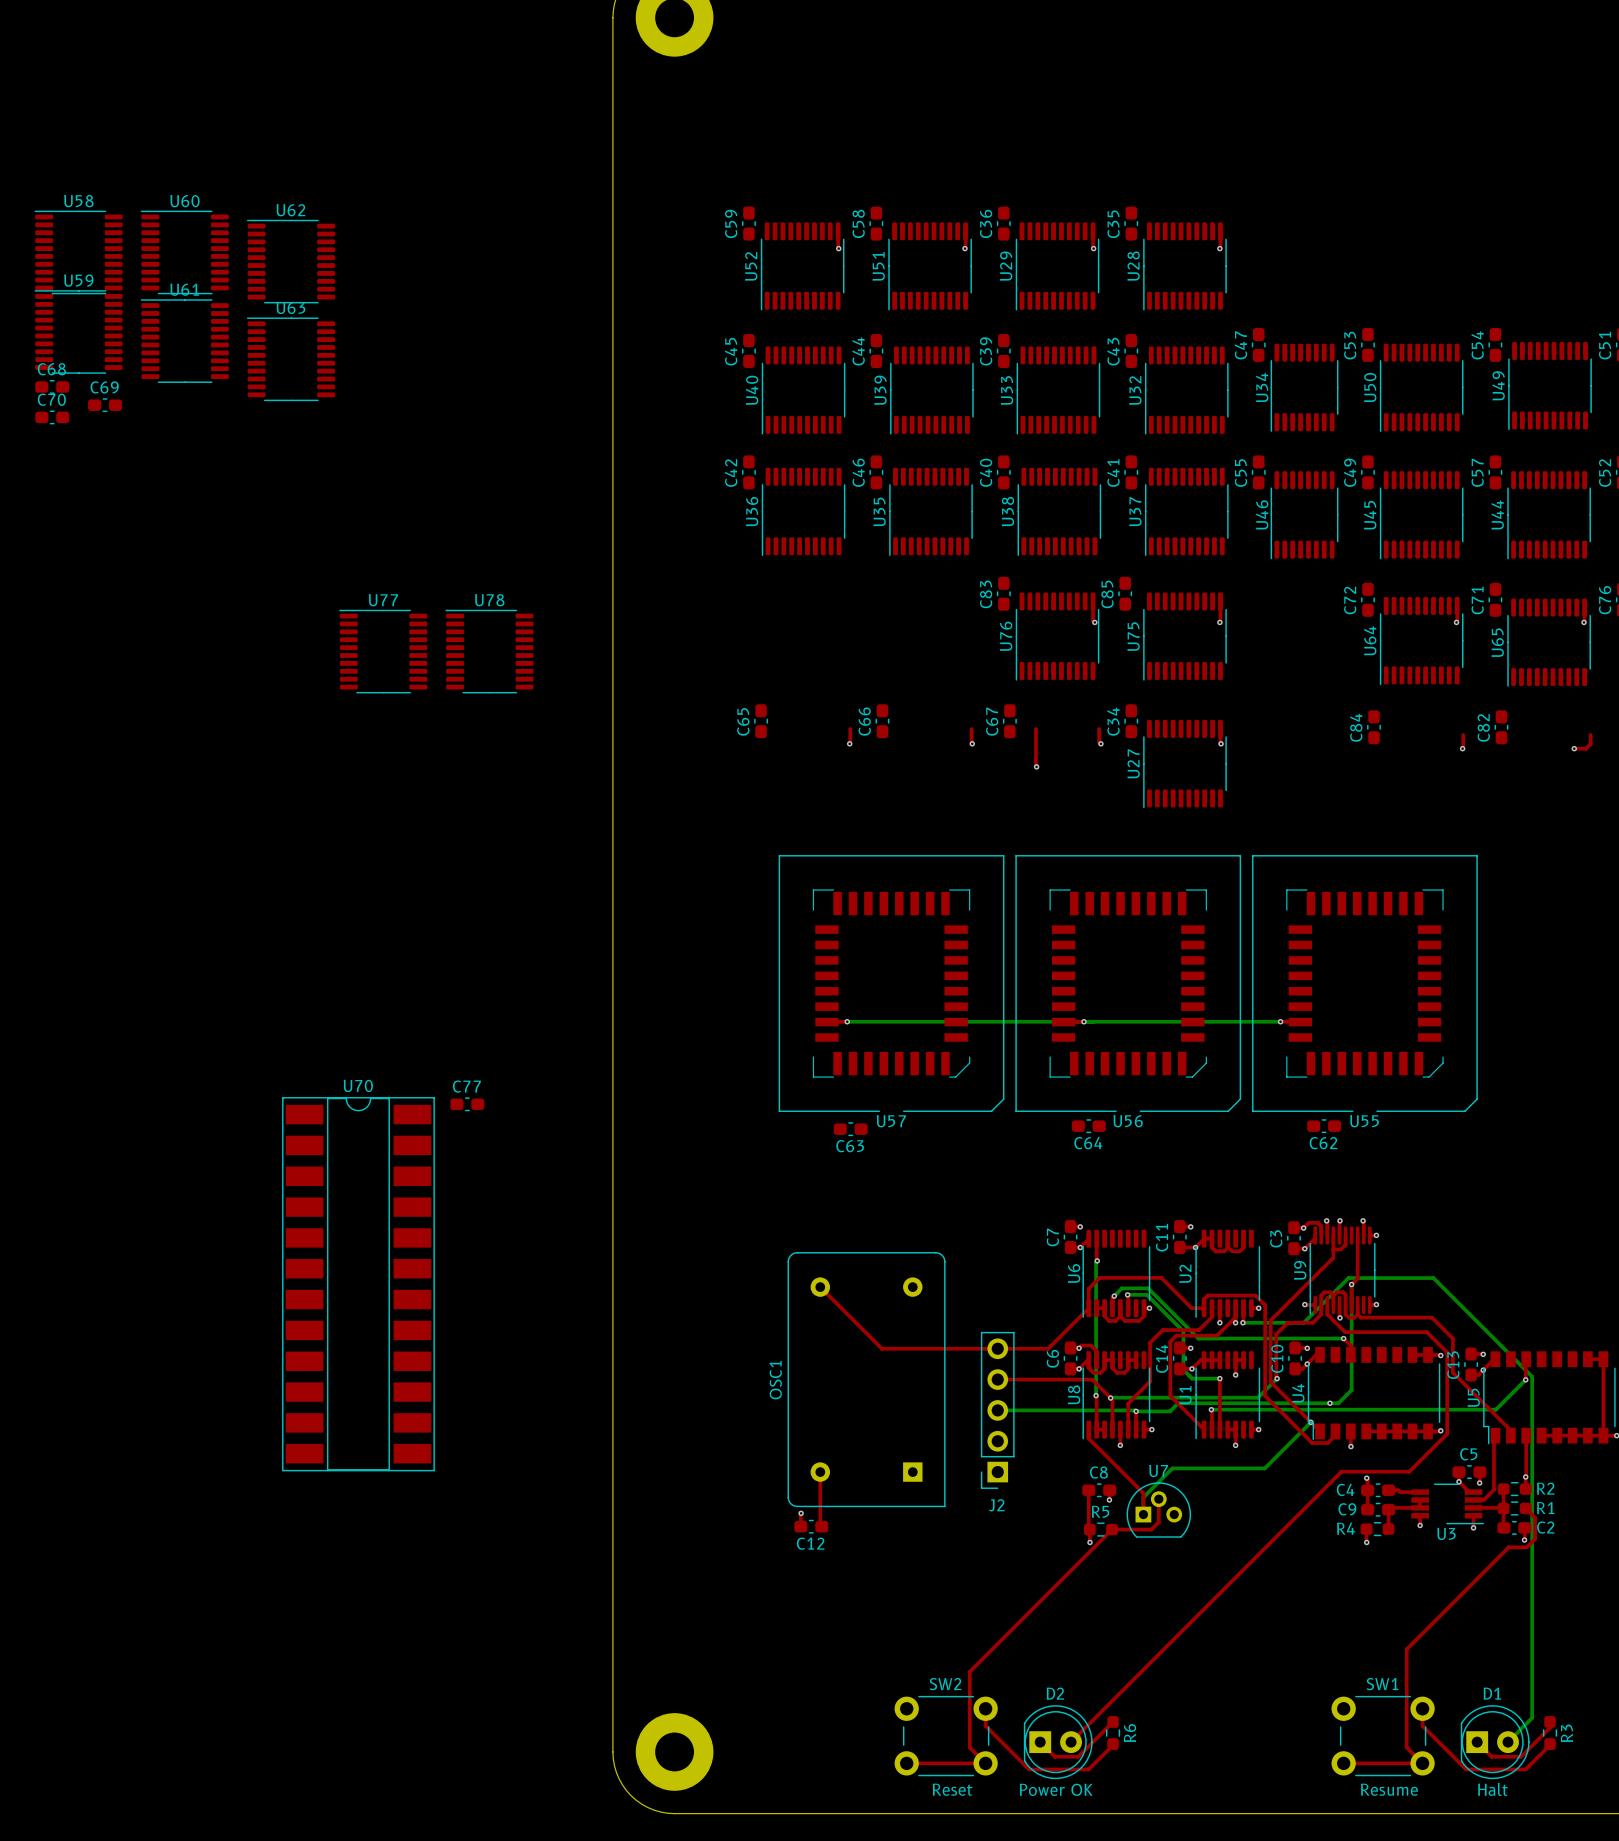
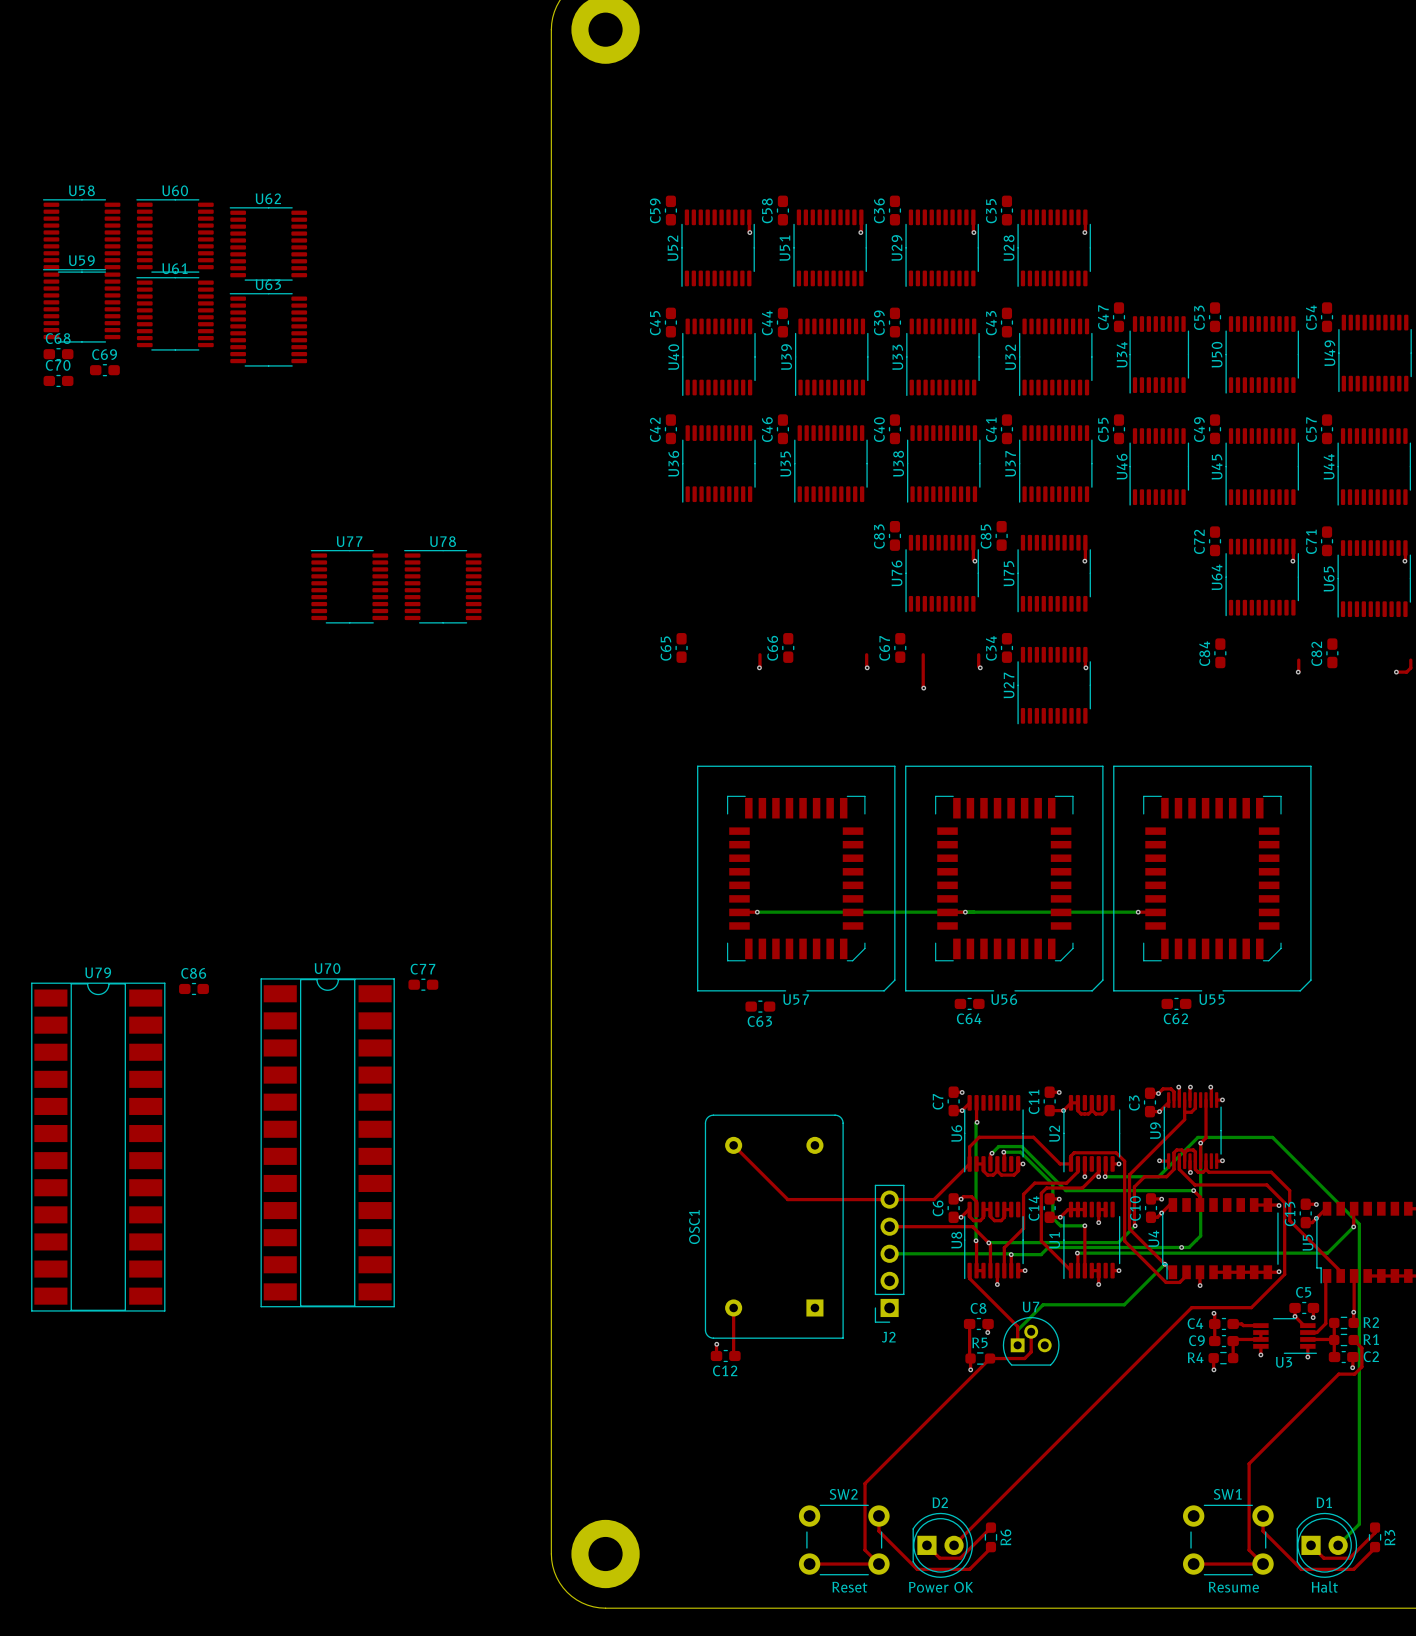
C86: none -> (193, 988)
U79: none -> (98, 1147)

